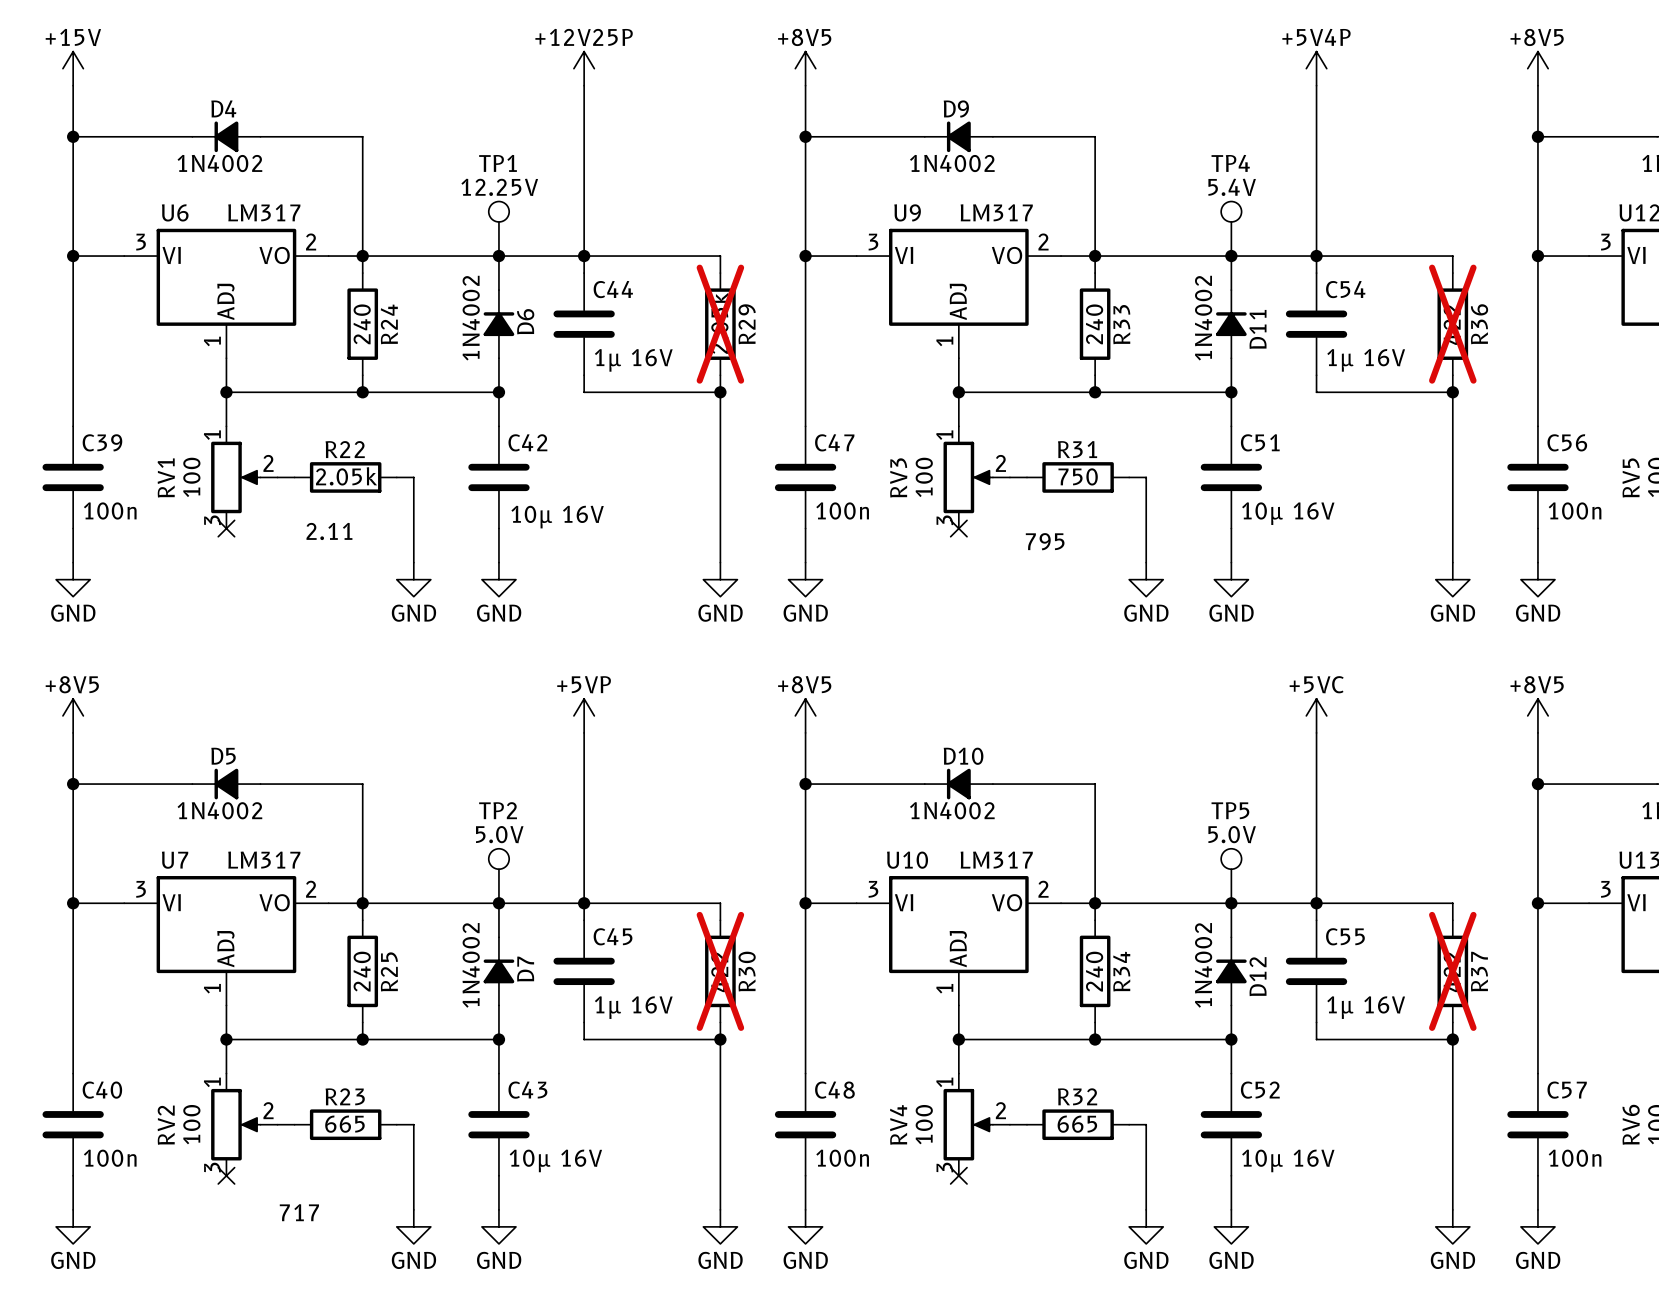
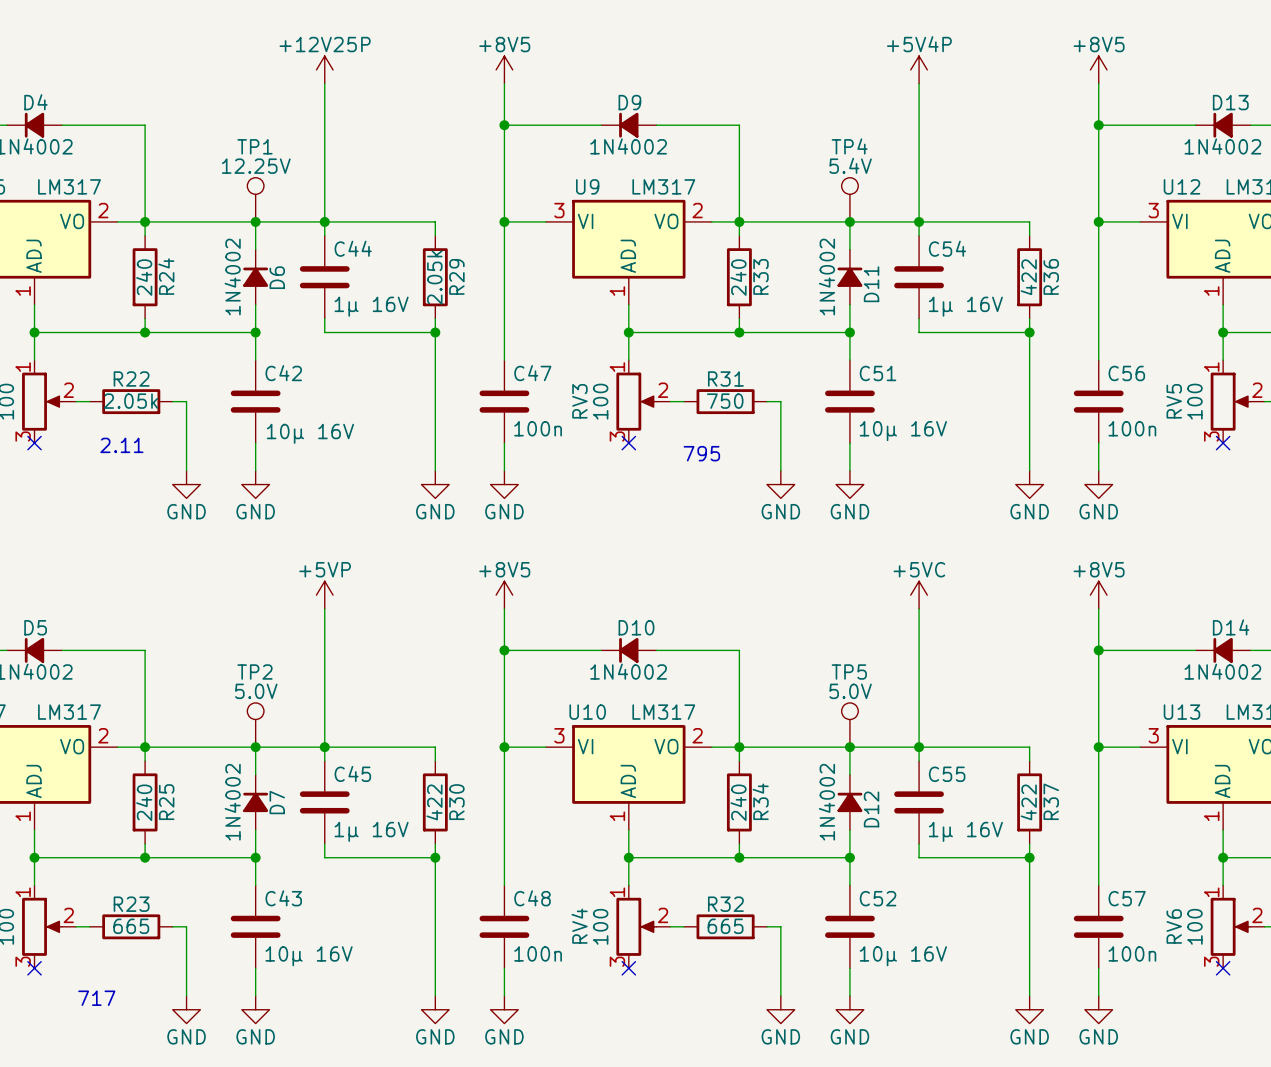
R29 do-not-place cross: (720, 324) -> none
R36 do-not-place cross: (1452, 324) -> none
R30 do-not-place cross: (720, 971) -> none
R37 do-not-place cross: (1452, 971) -> none

